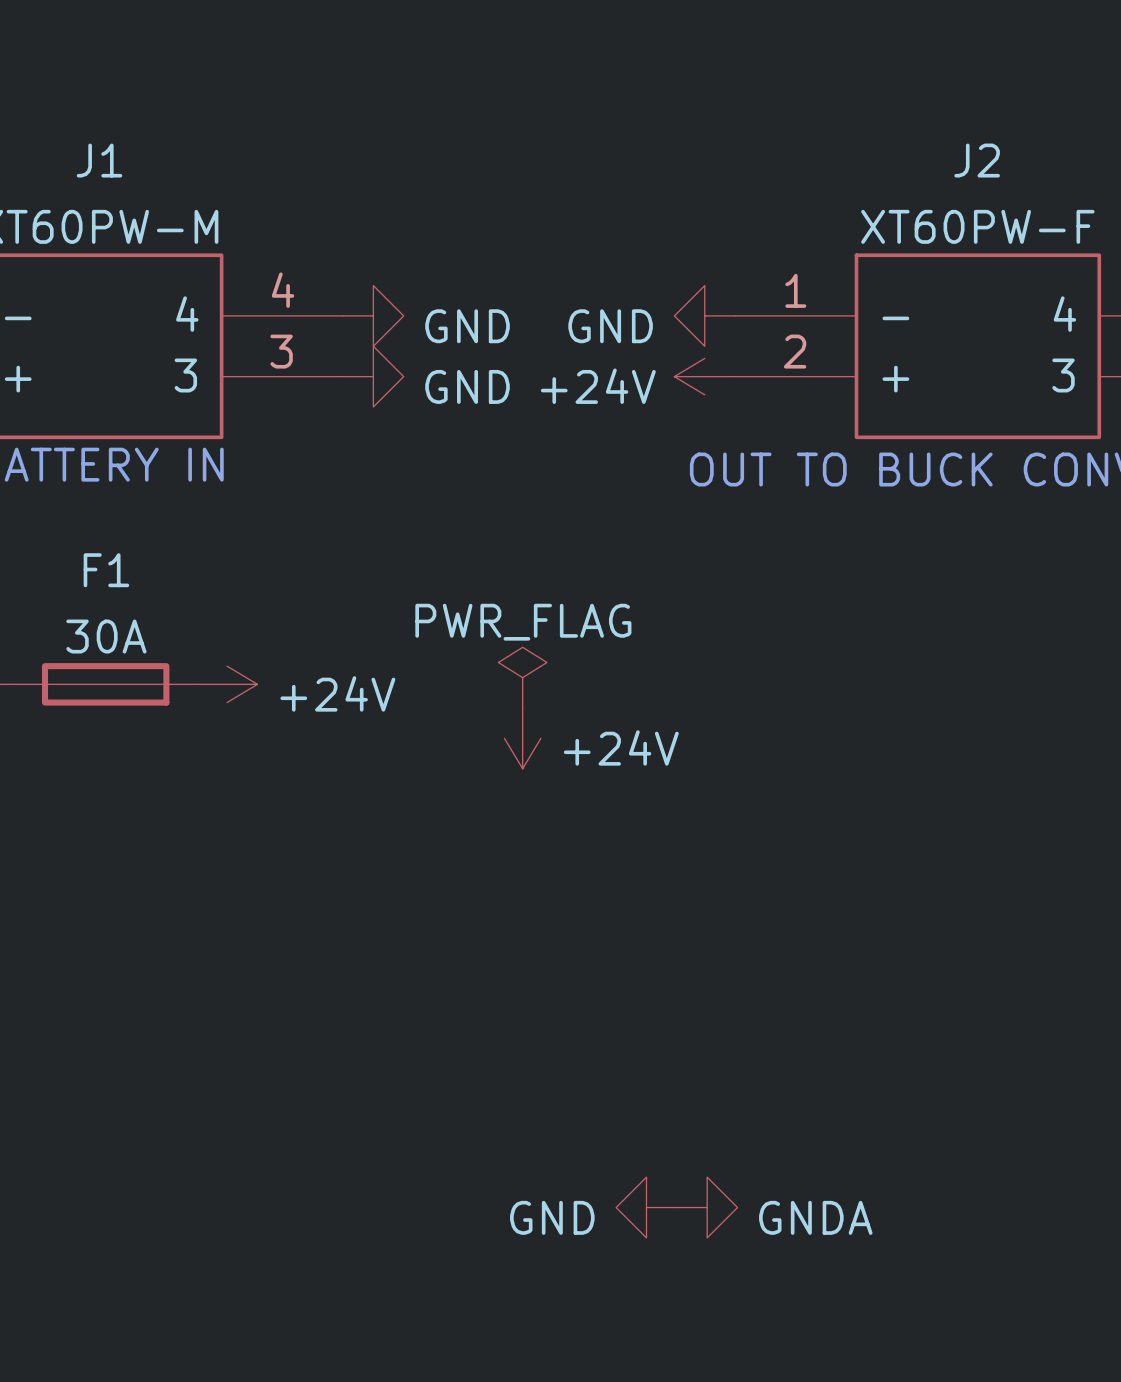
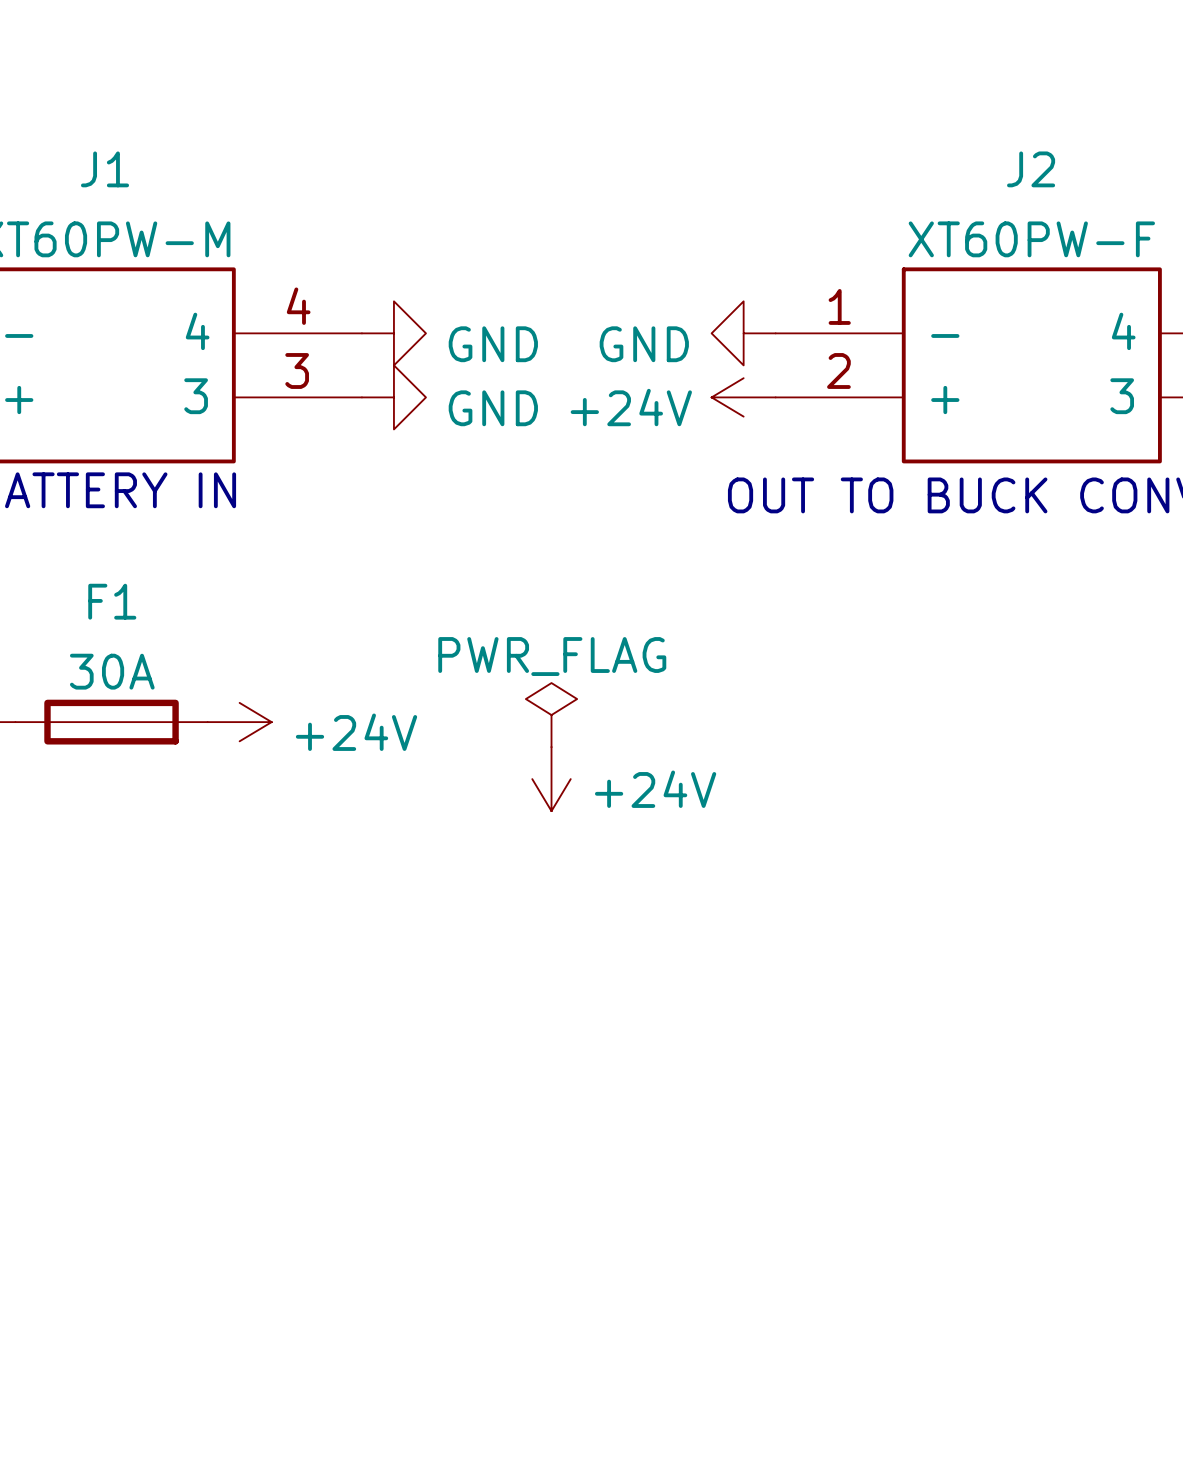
power symbol: GND (646, 1207) -> none
power symbol: GNDA (707, 1207) -> none

